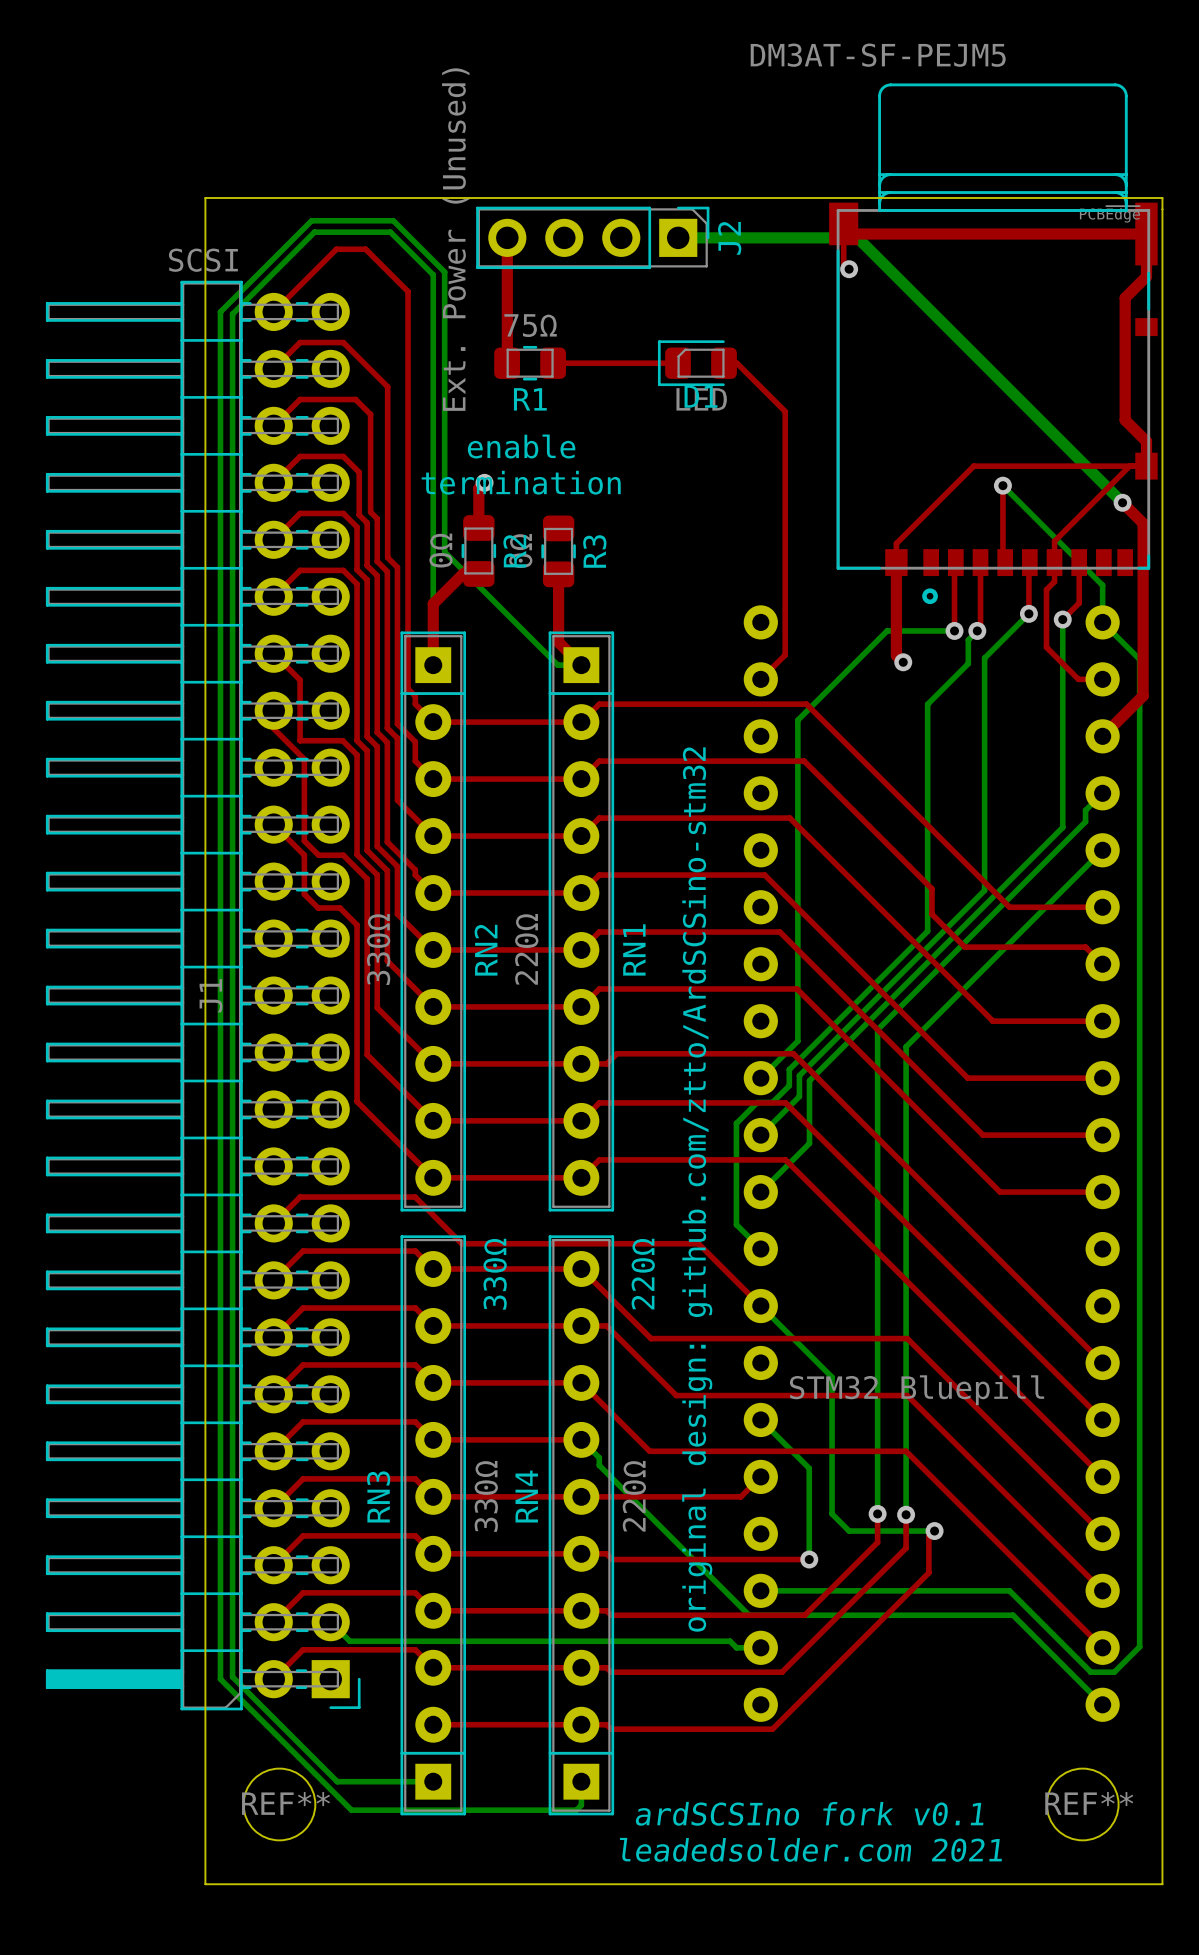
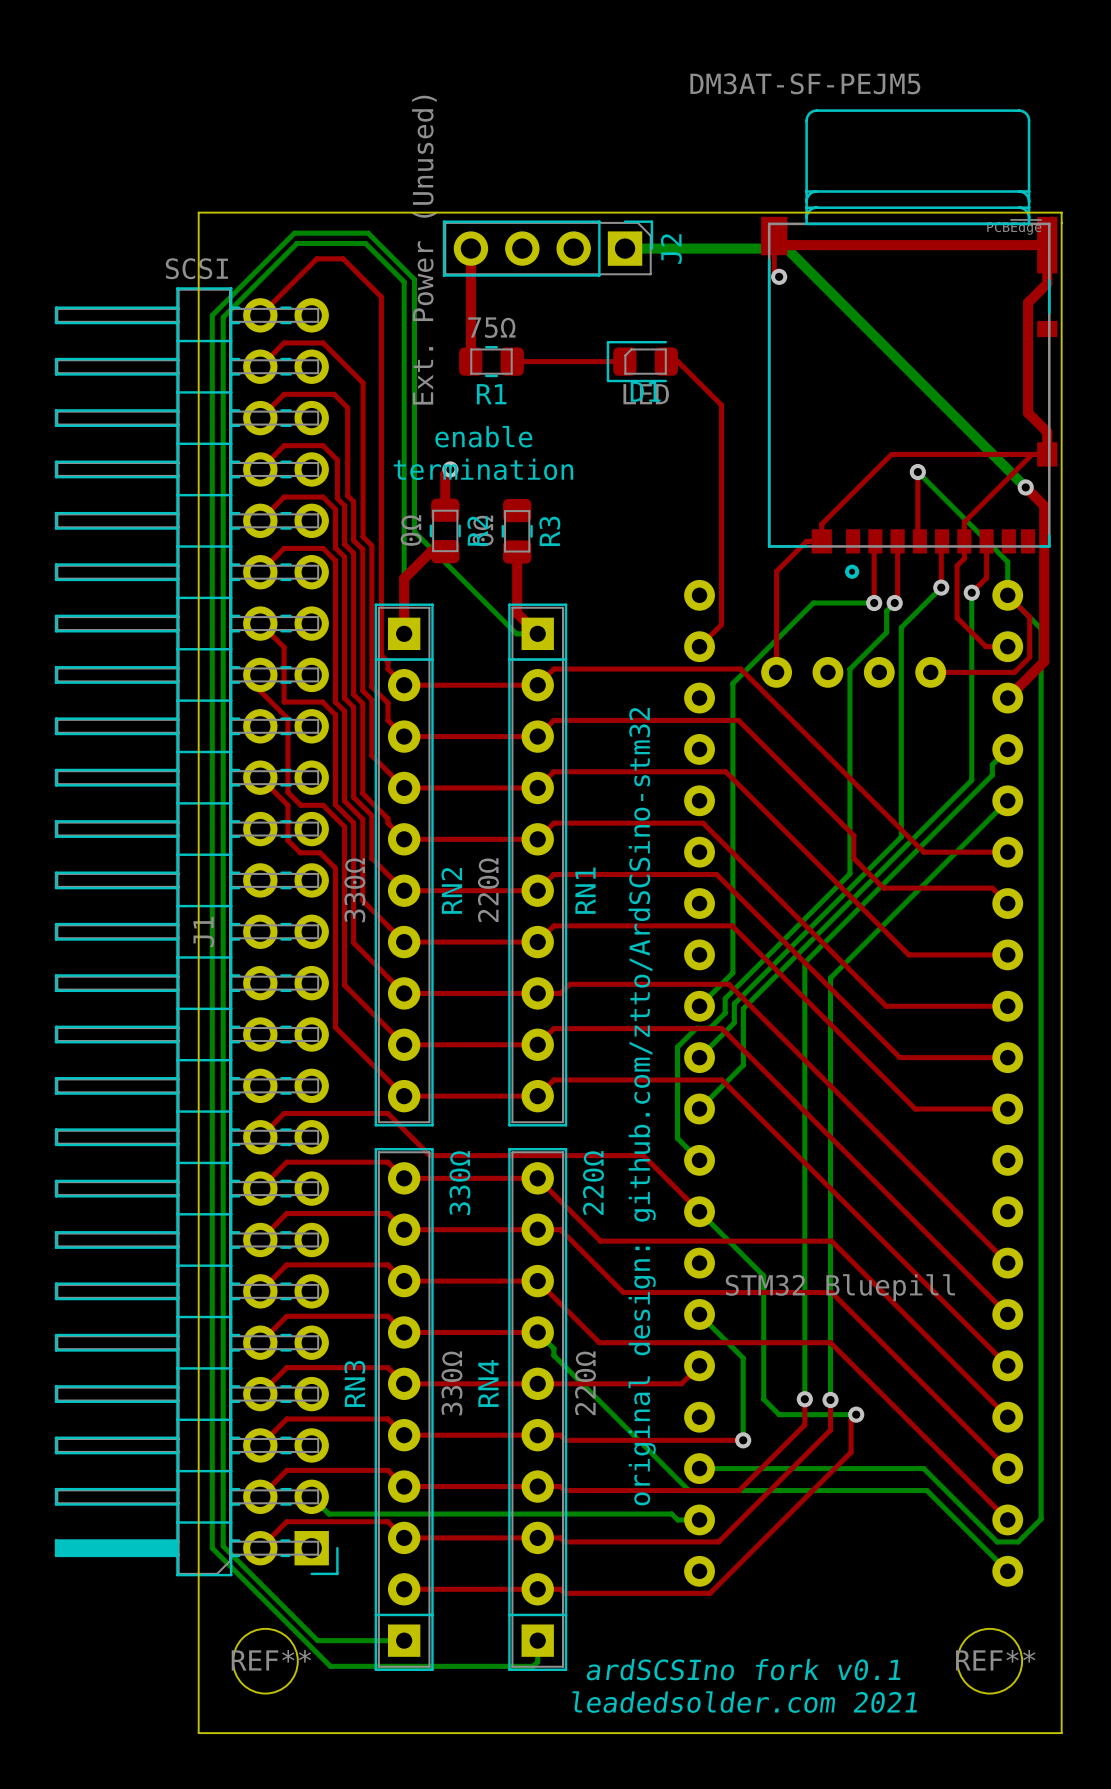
top track: (896, 562) (896, 655) (903, 662) -> (821, 541) (806, 541) (776, 571) (776, 672)
part footprint: [743, 605, 1120, 1722] -> [684, 579, 1024, 1587]
top track: none -> (1007, 595) (1029, 617) (1029, 657) (1014, 672) (930, 672)
via: (903, 662) -> none

